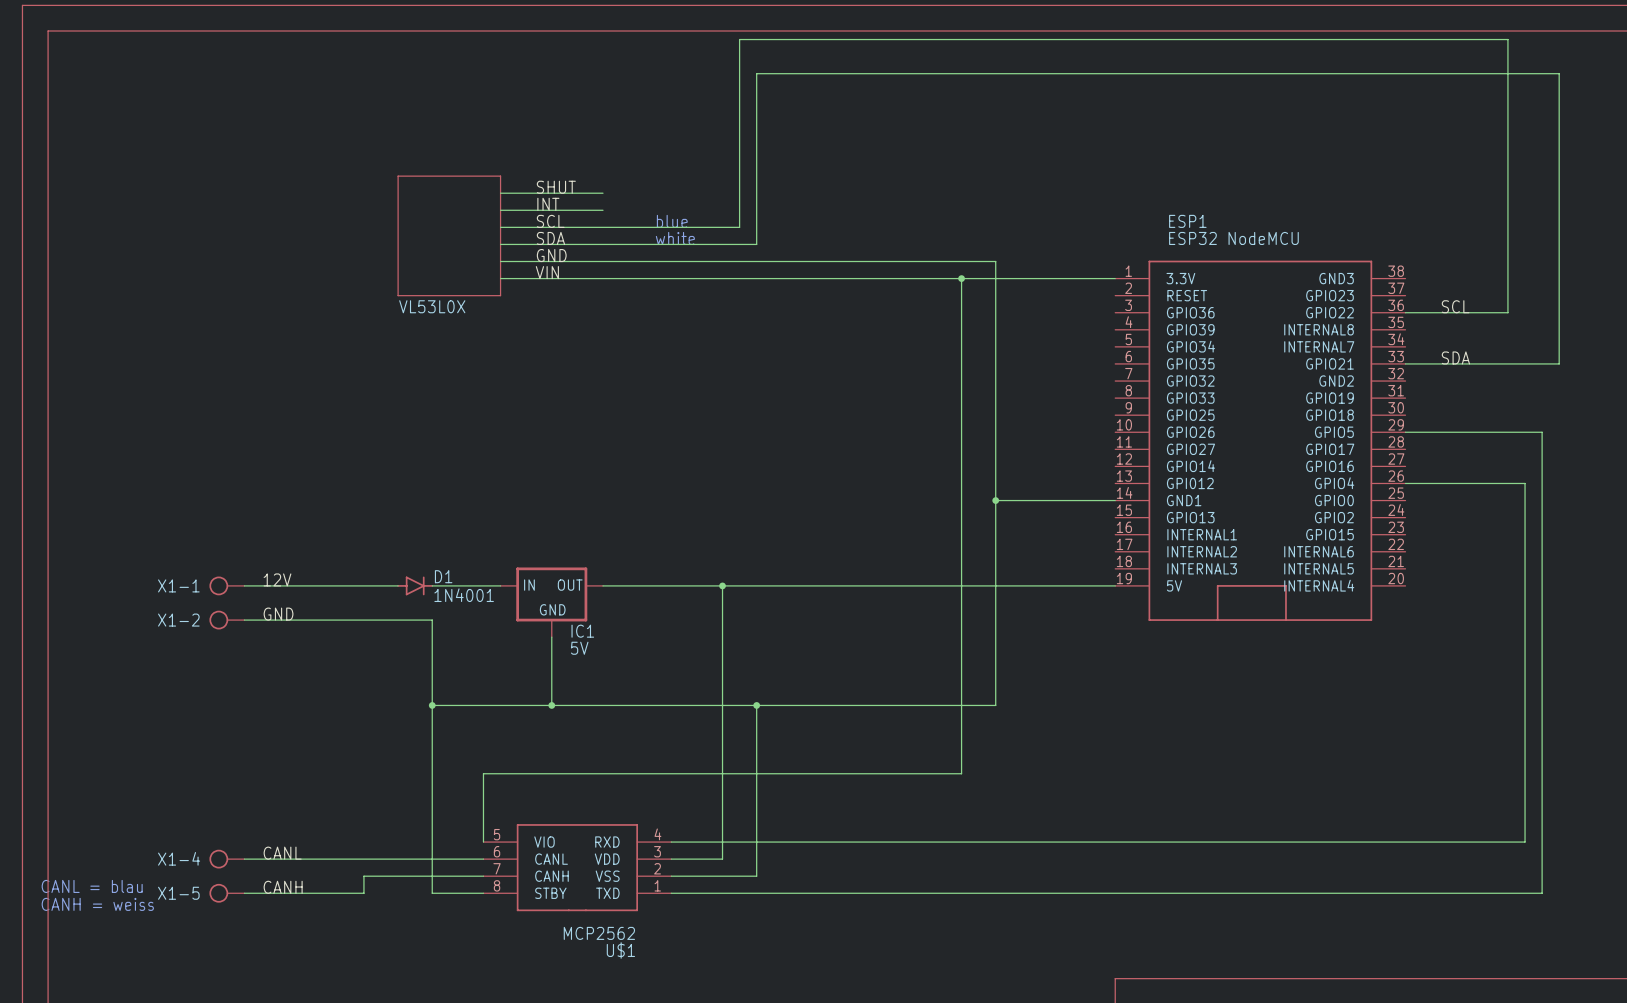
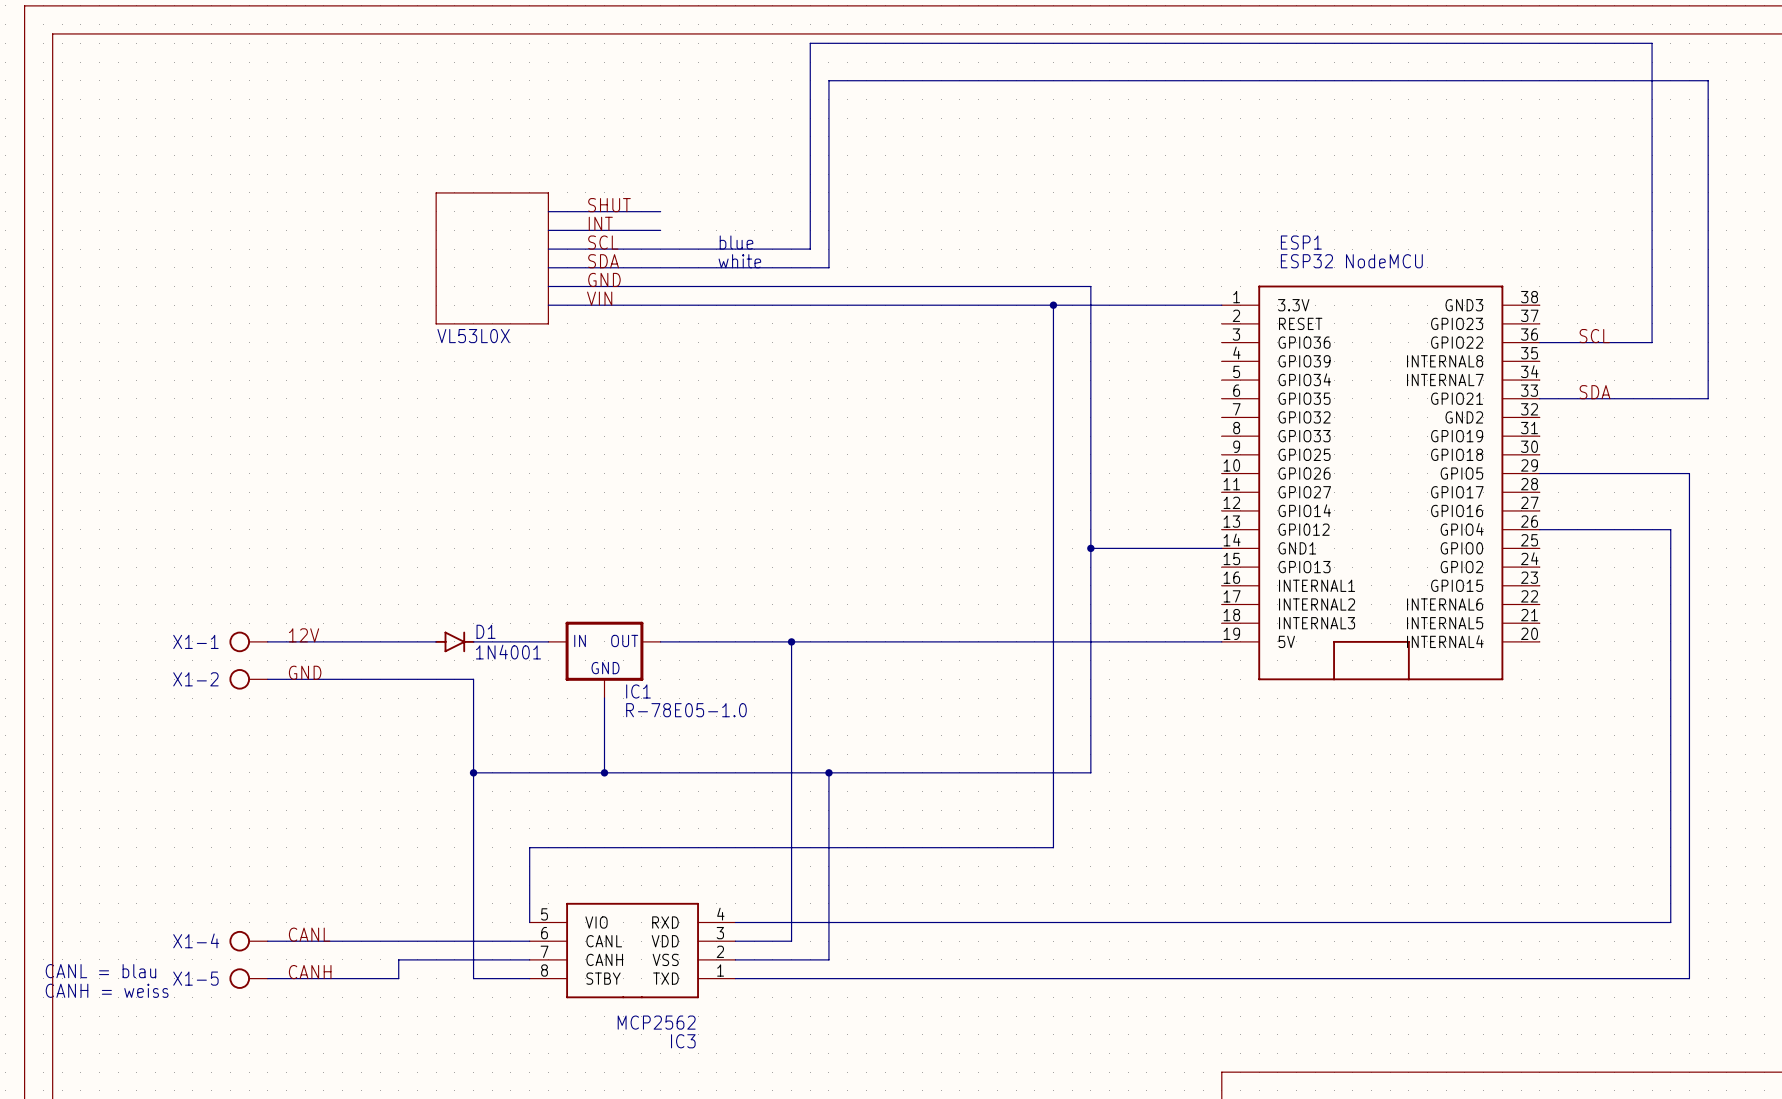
IC1 value: 5V (579, 648) -> R-78E05-1.0 (686, 710)
U$1 name: U$1 (620, 950) -> IC3 (683, 1041)

